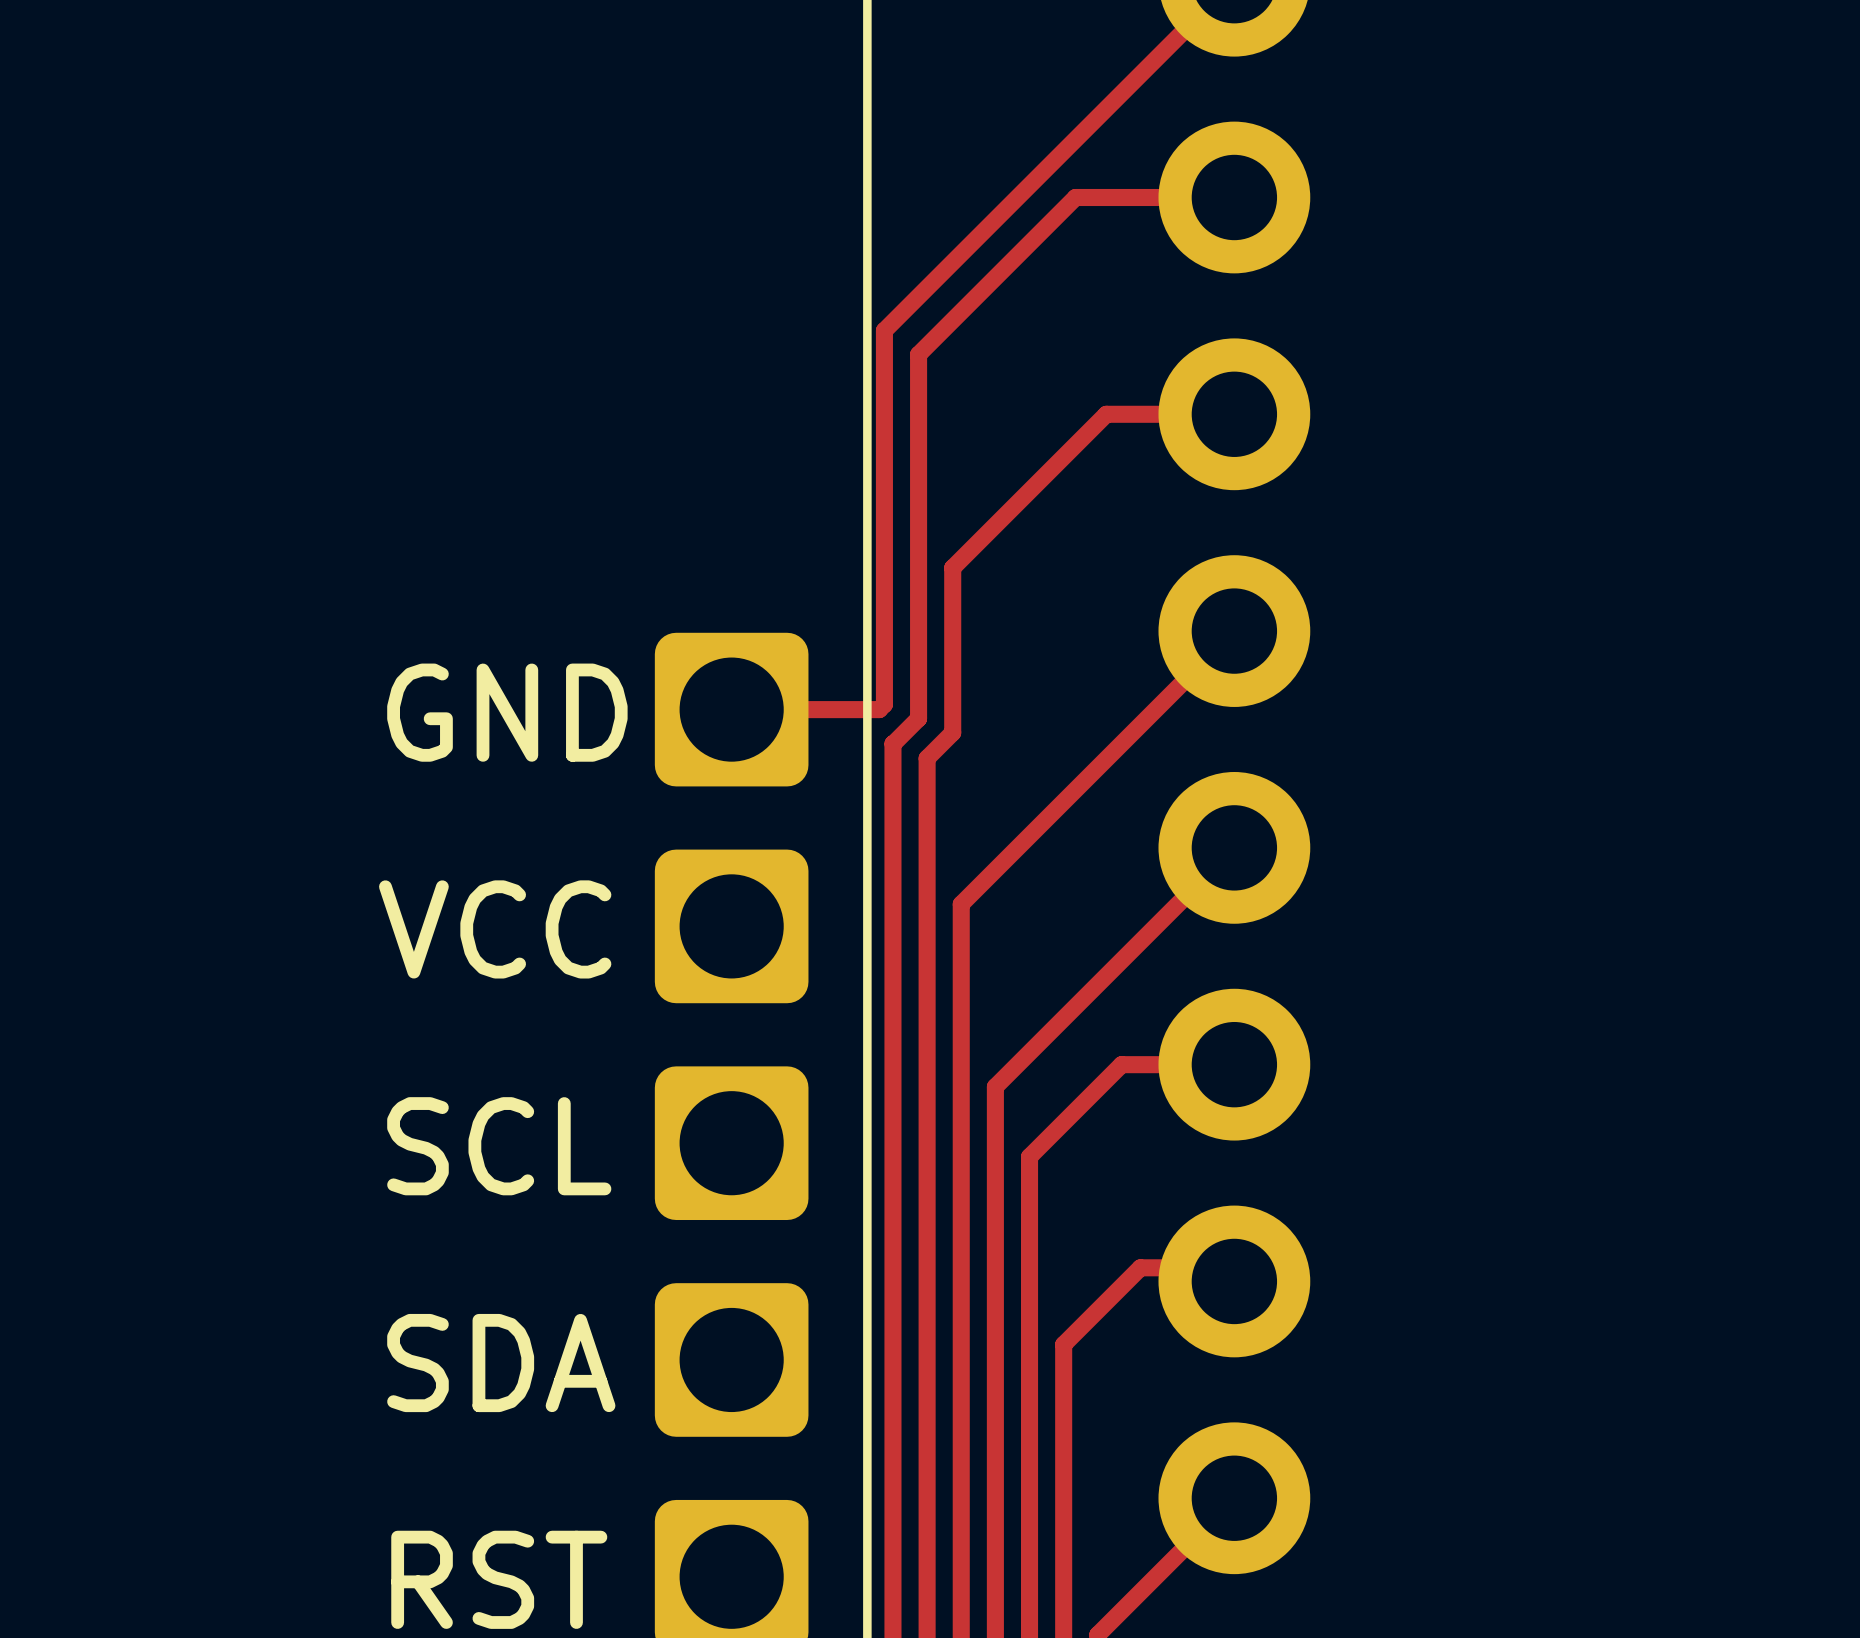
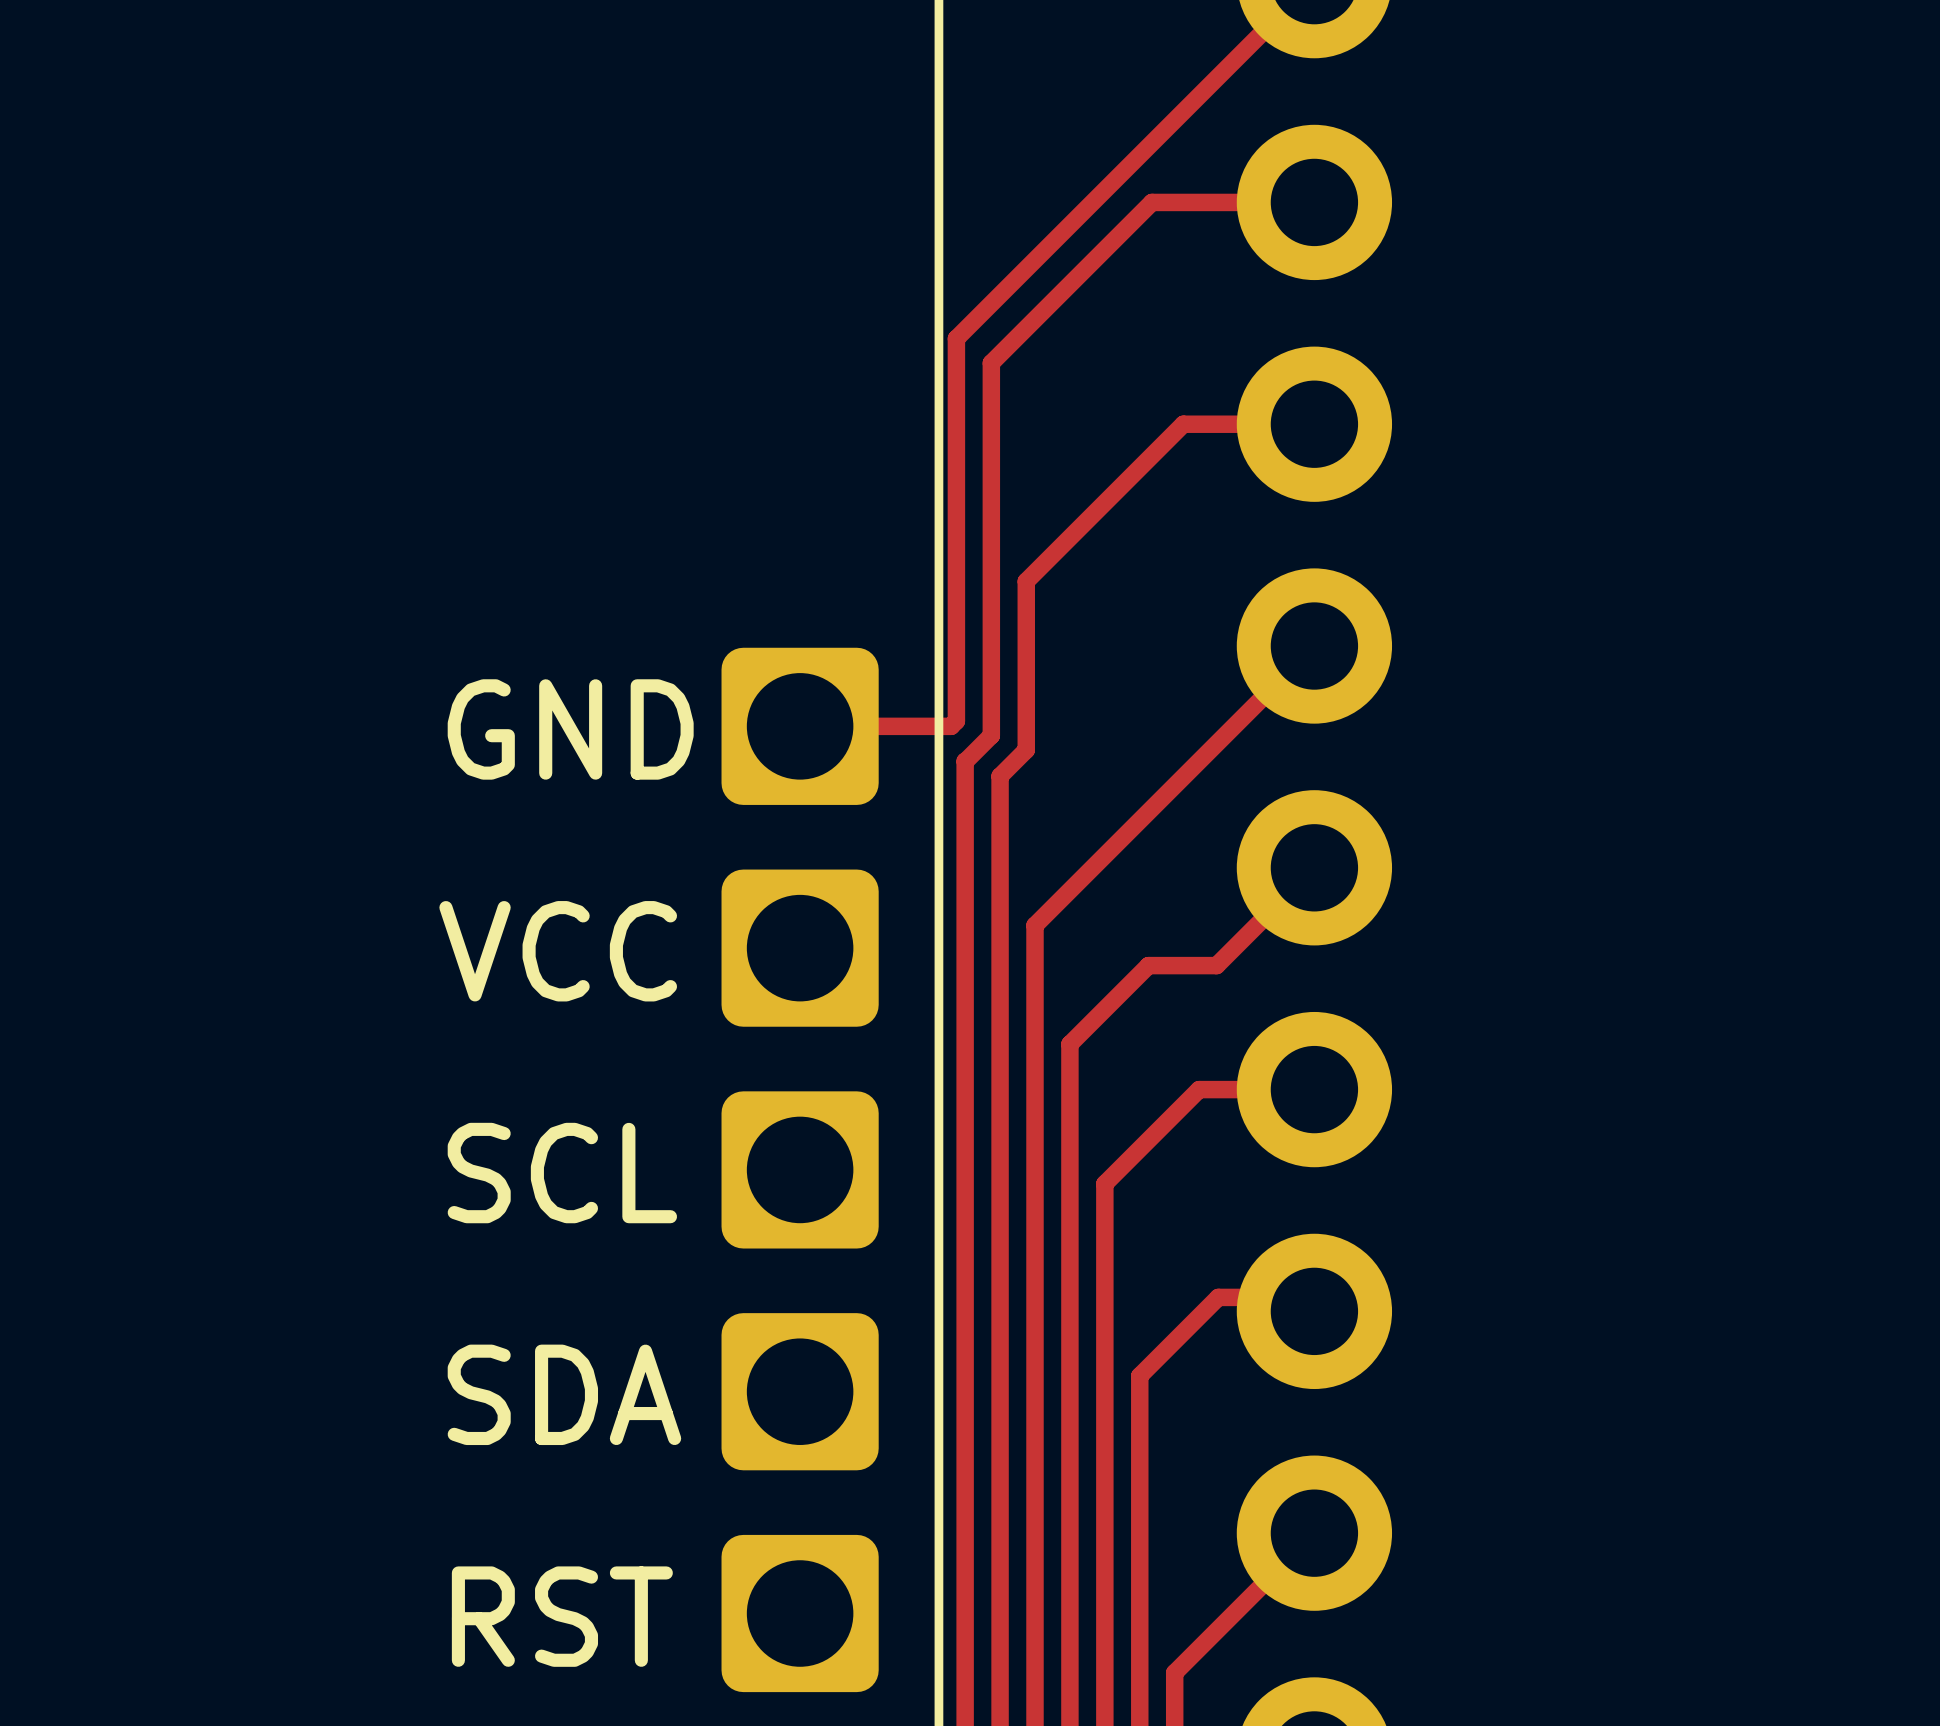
track: (1138, 943) (995, 1086) -> (1216, 965) (1148, 965) (1069, 1044) (1069, 1112)

